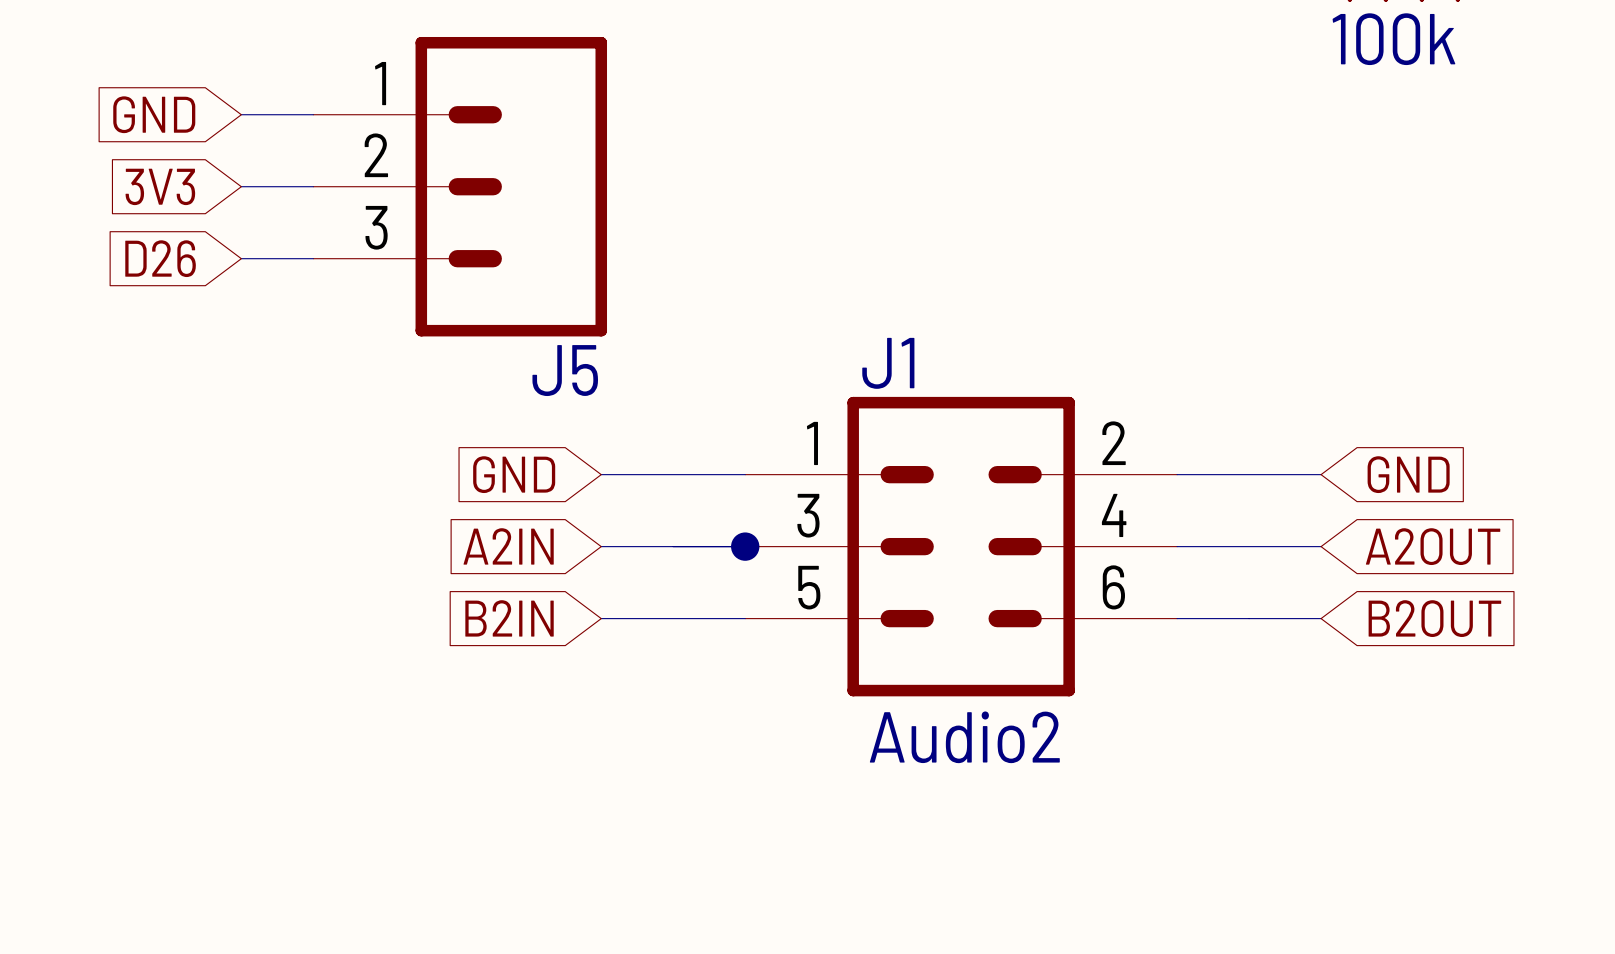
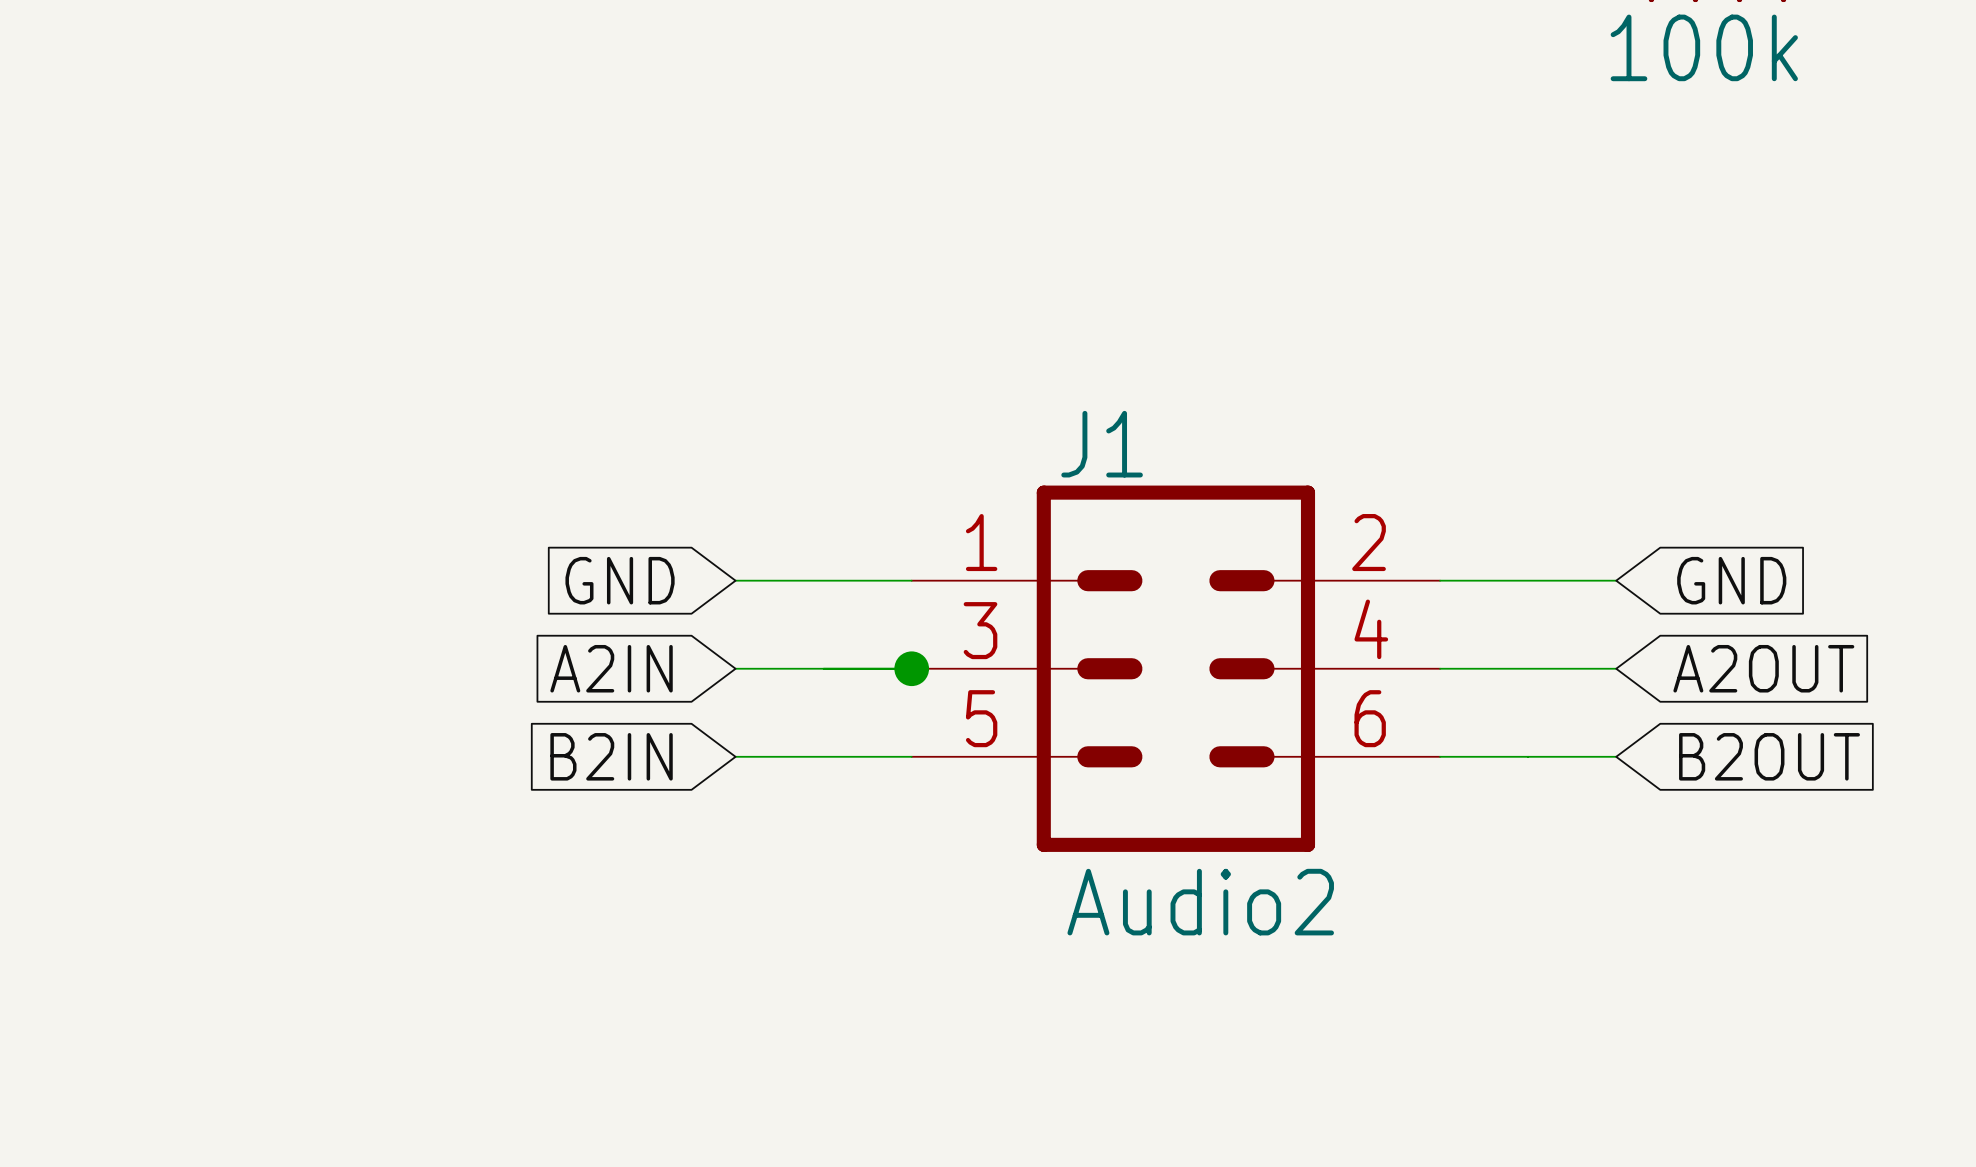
global label: GND (154, 114) -> none
wire: (241, 114) (313, 114) -> none
global label: 3V3 (160, 186) -> none
wire: (241, 186) (313, 186) -> none
J5: (460, 186) -> none
global label: D26 (160, 258) -> none
wire: (241, 258) (313, 258) -> none

